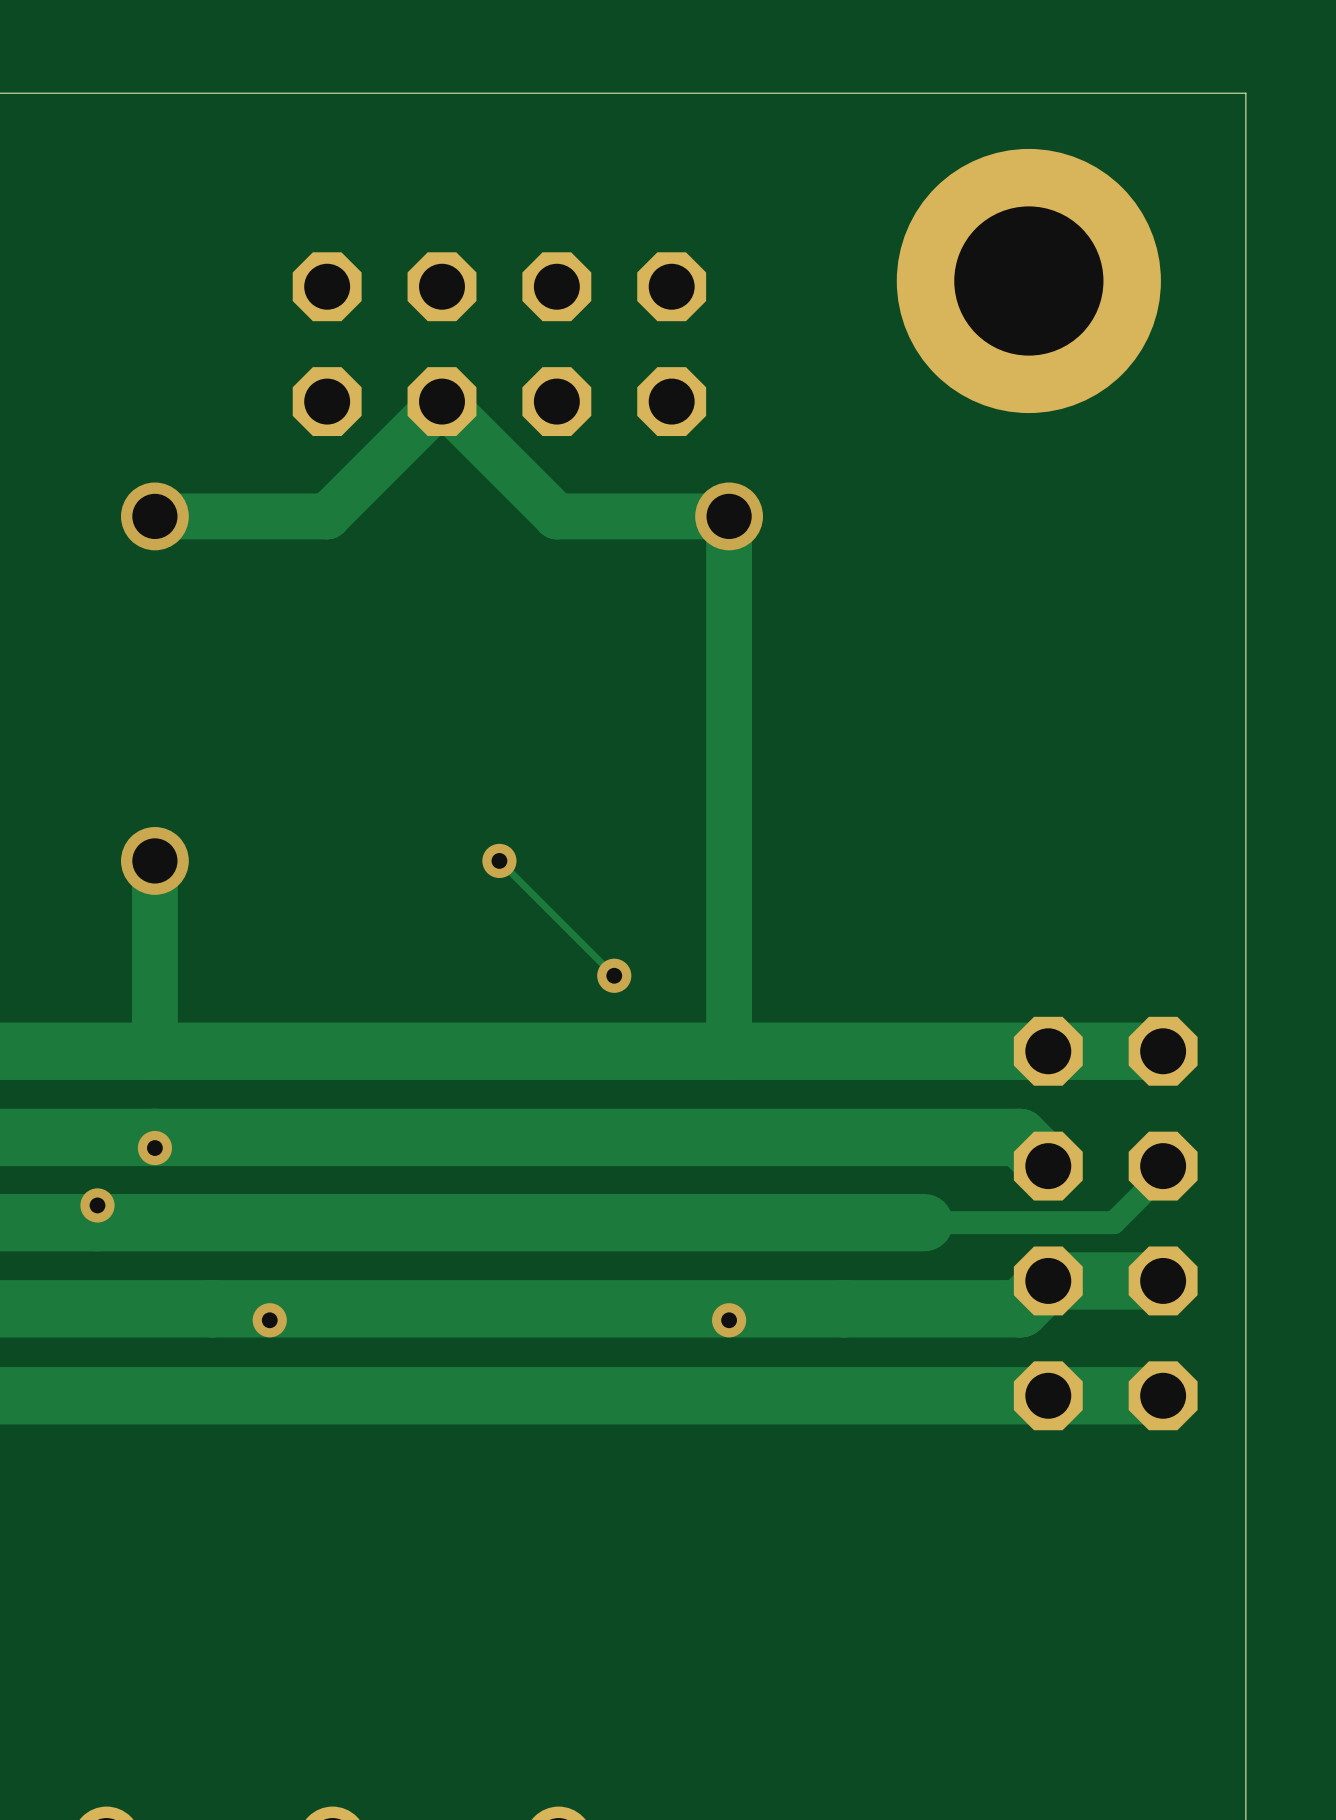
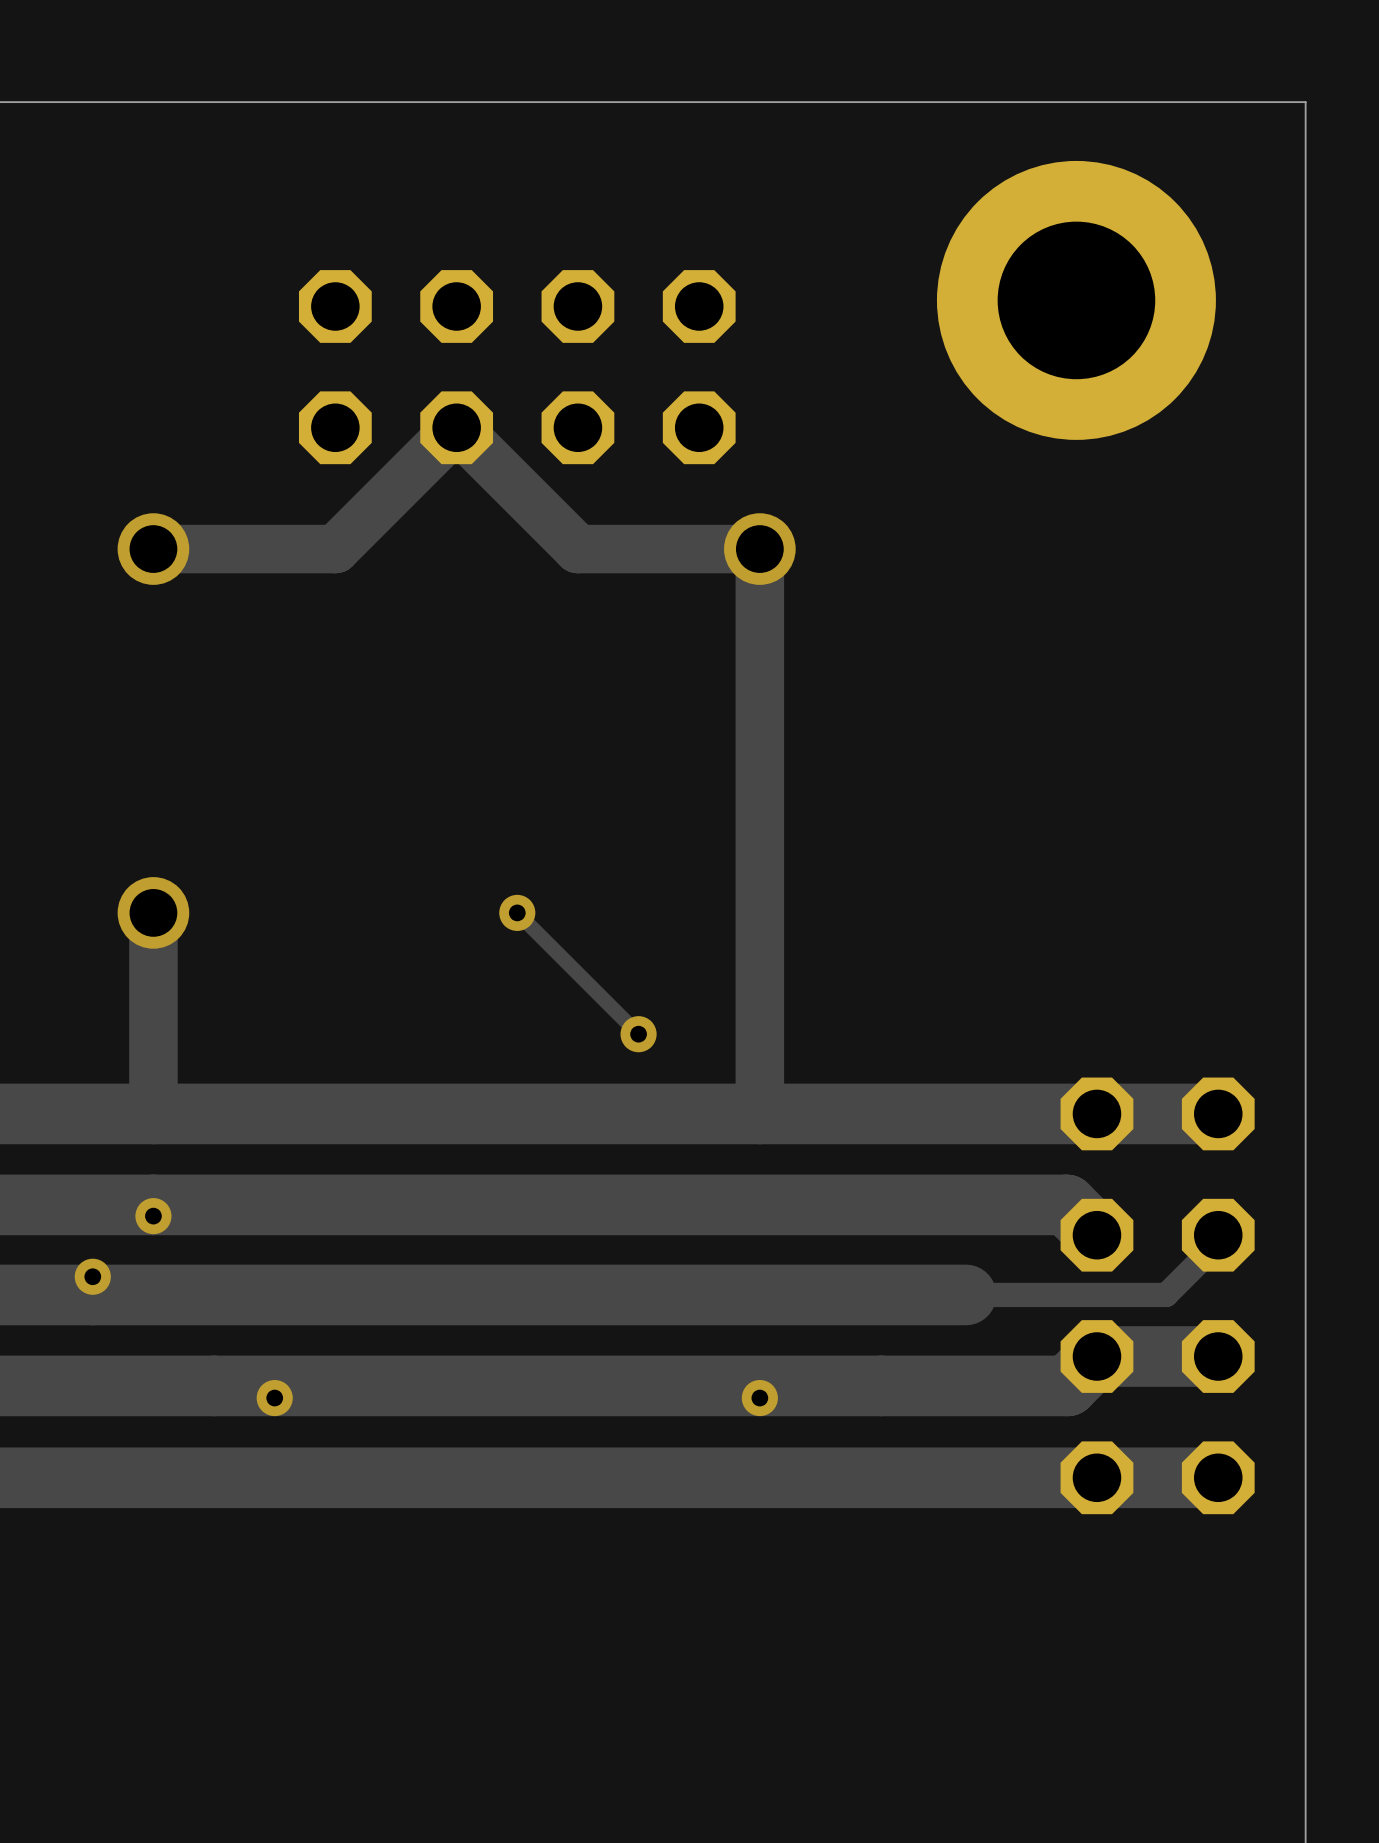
track width: thin (499, 860) (614, 975) -> thick (517, 912) (638, 1034)

